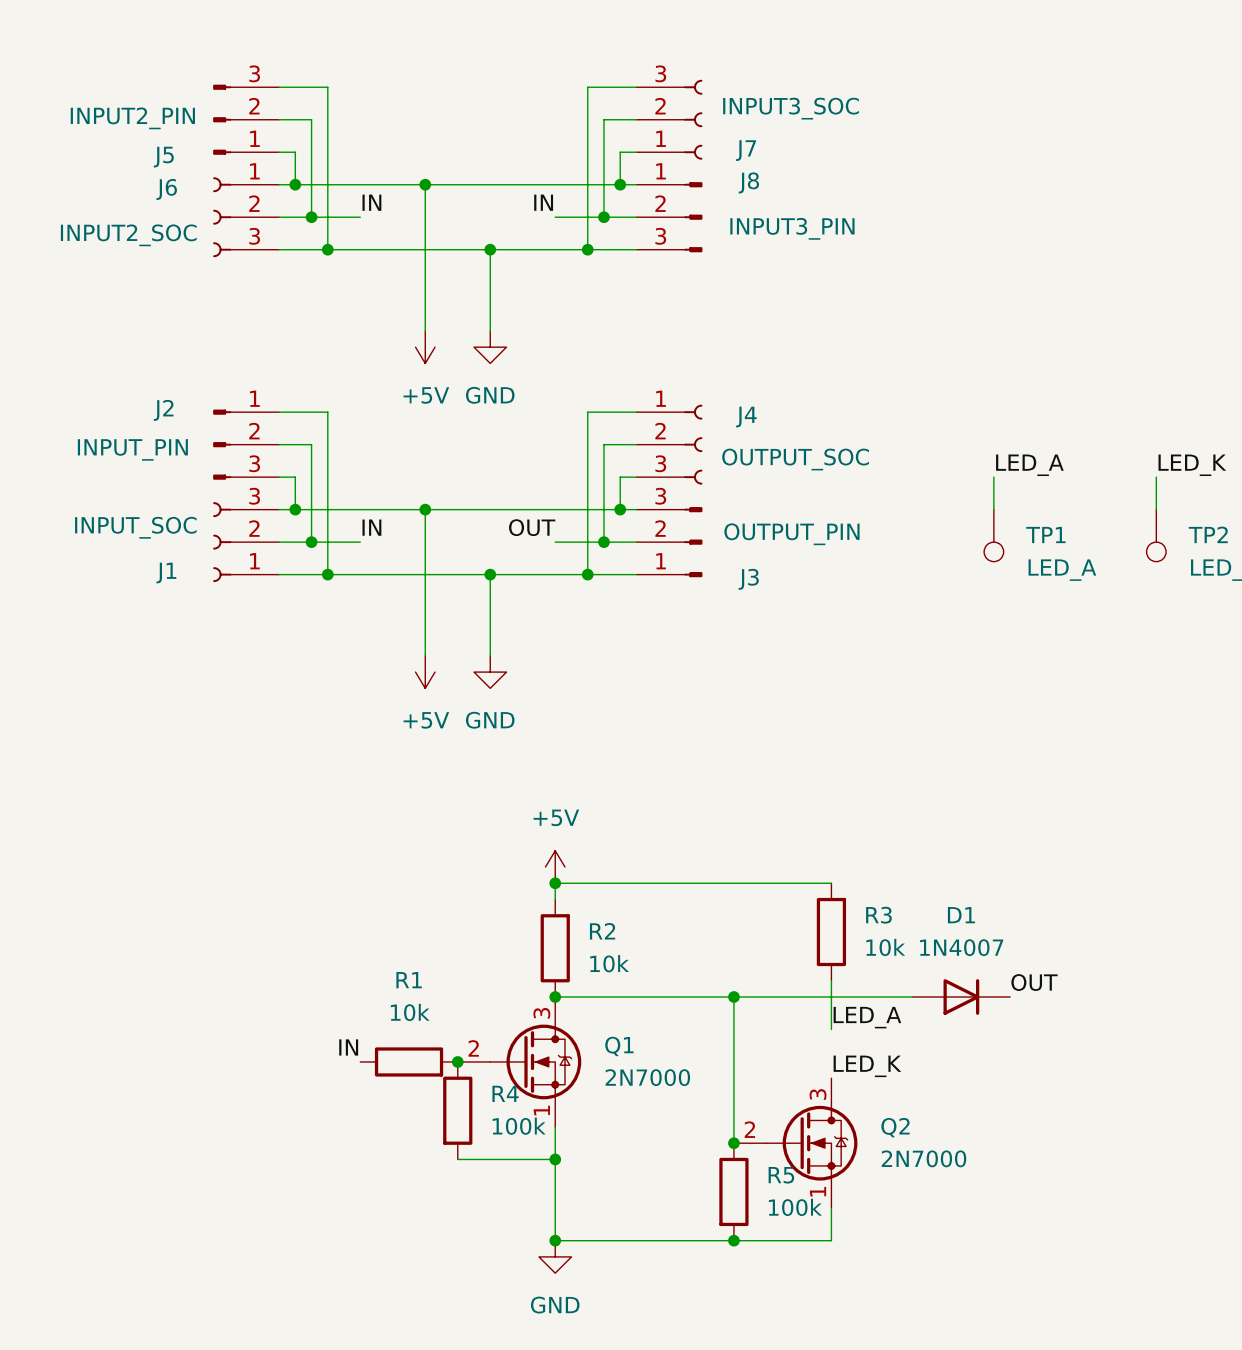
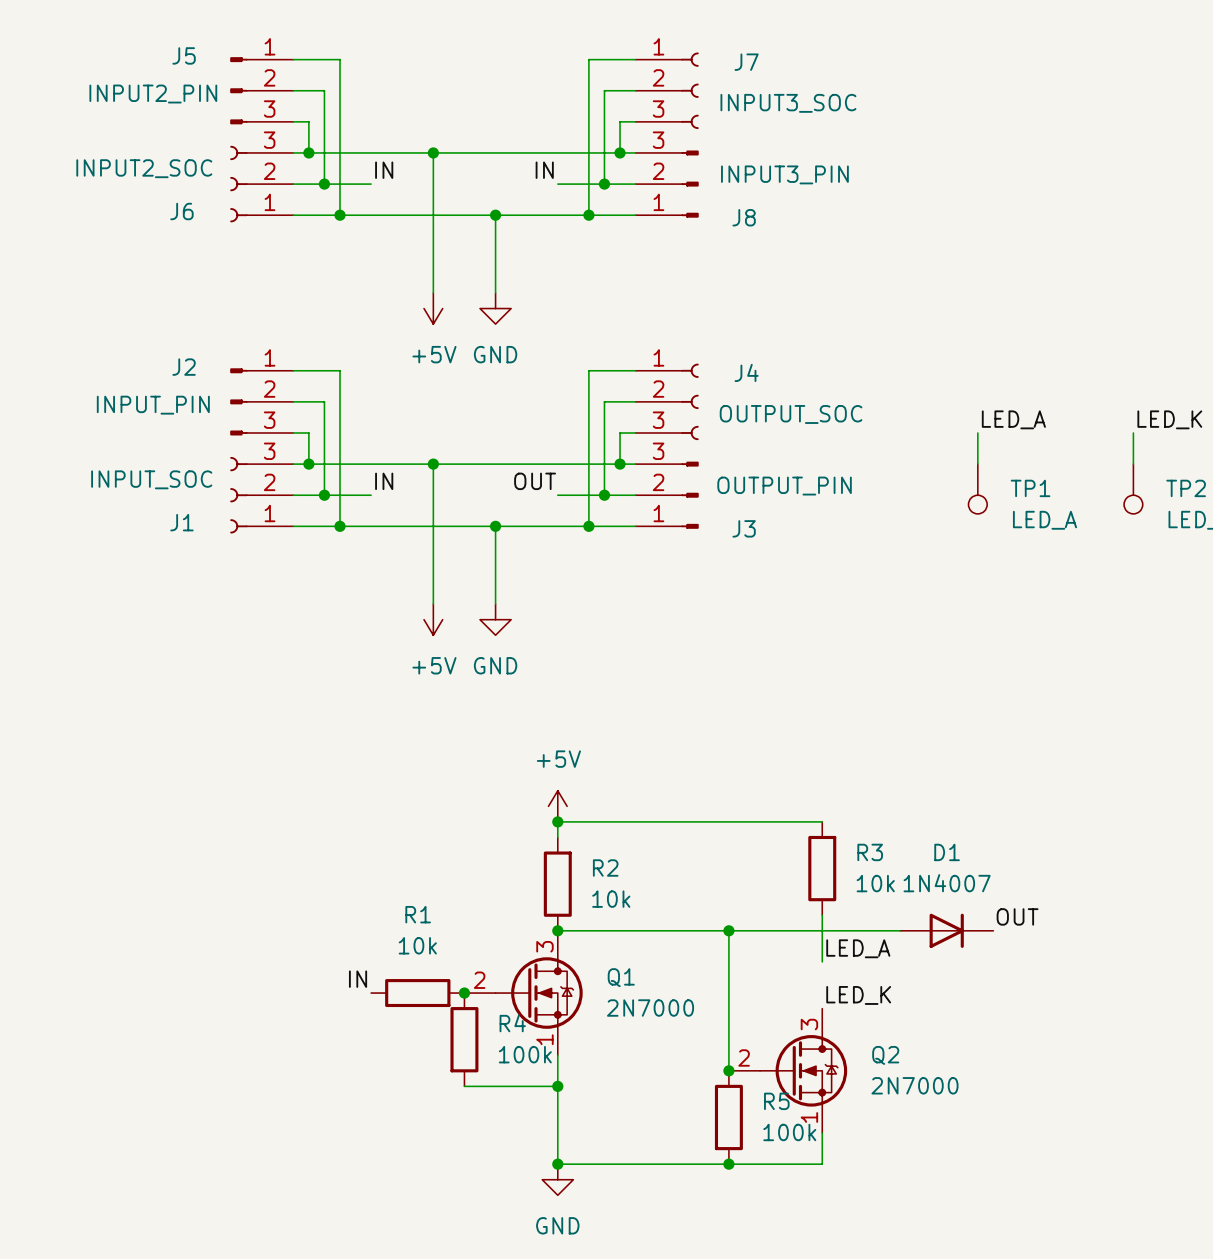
J5 flip: as is (222, 119) -> up-down (238, 90)
J7 flip: as is (693, 119) -> up-down (690, 90)
J6 flip: as is (222, 217) -> up-down (238, 184)
J8 flip: as is (693, 217) -> up-down (690, 184)

